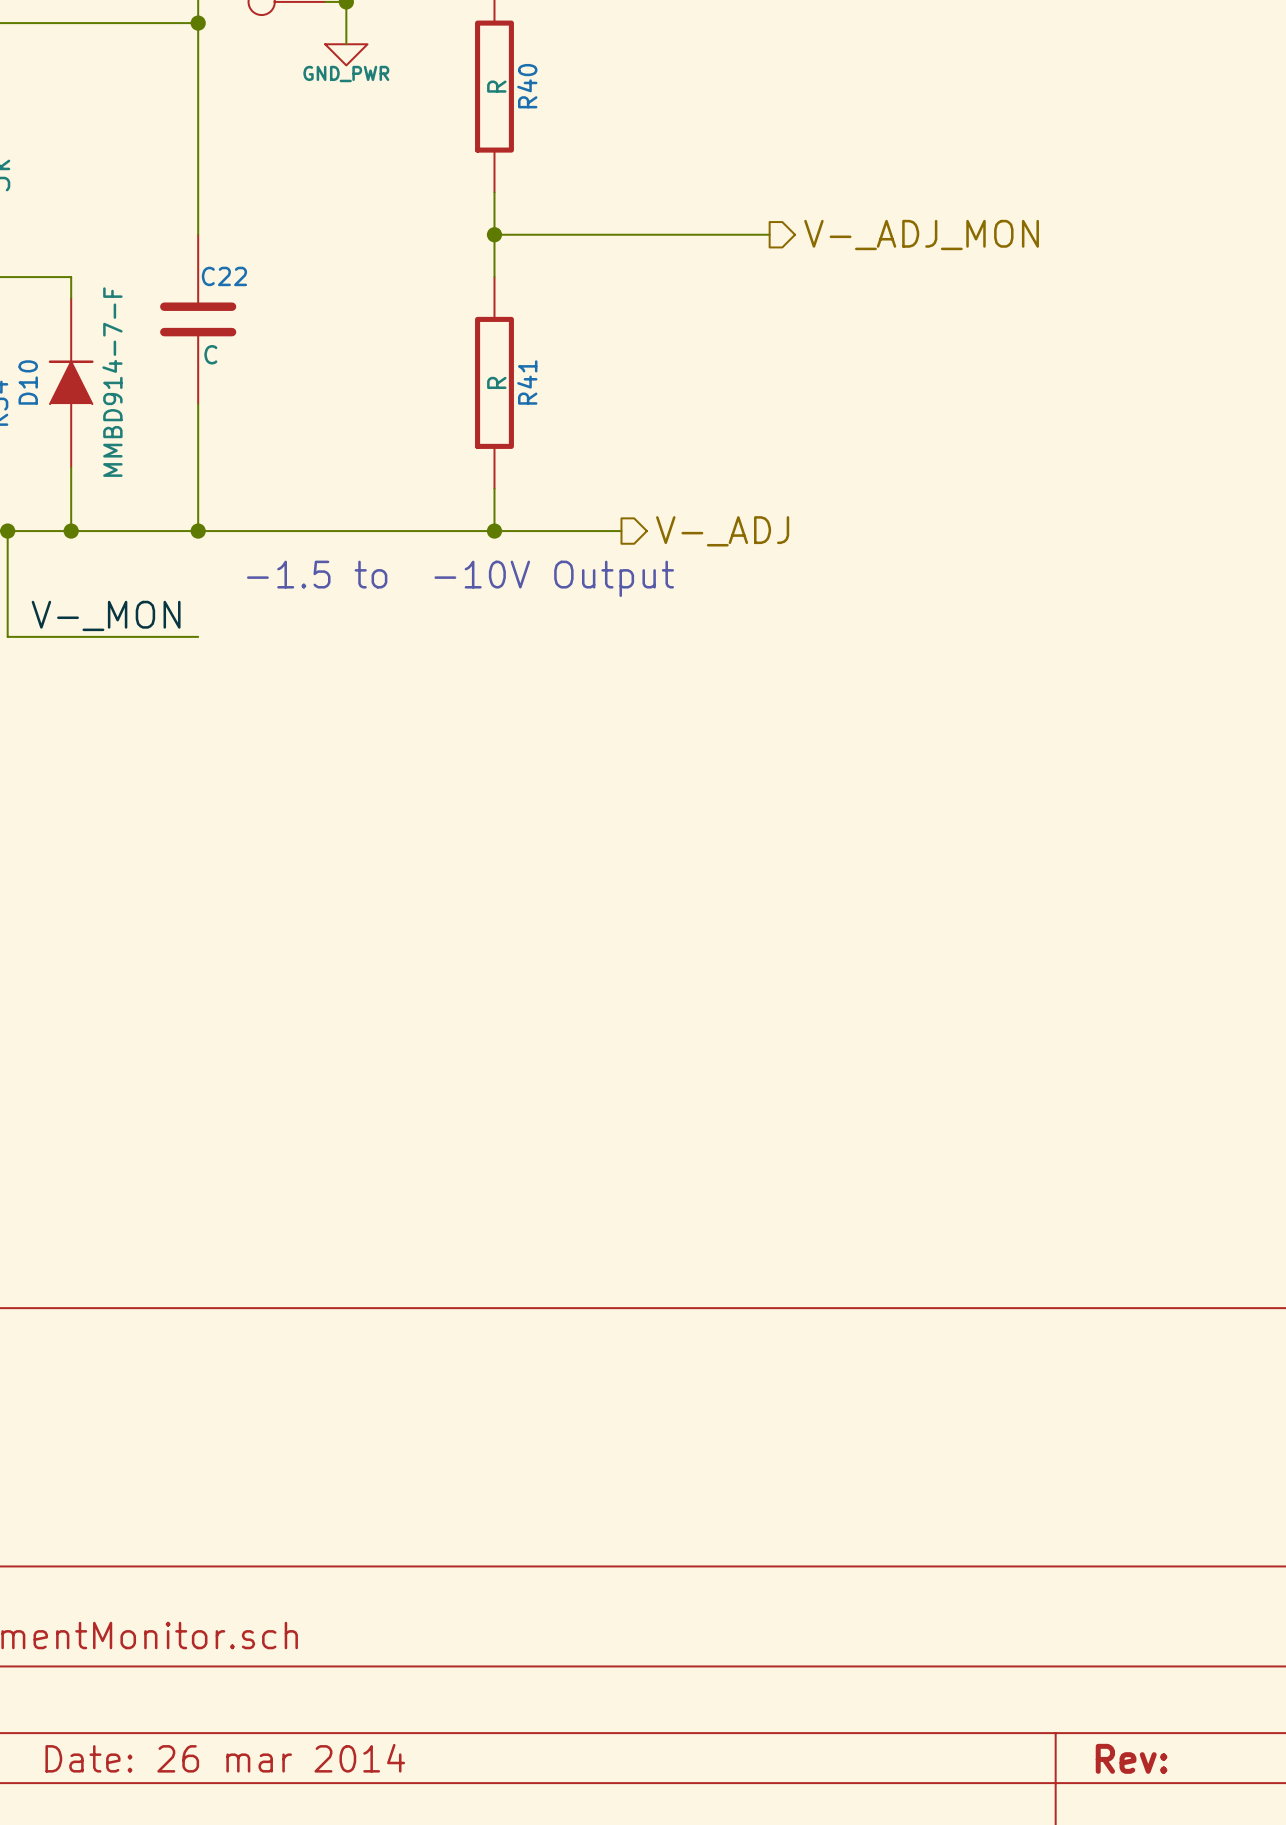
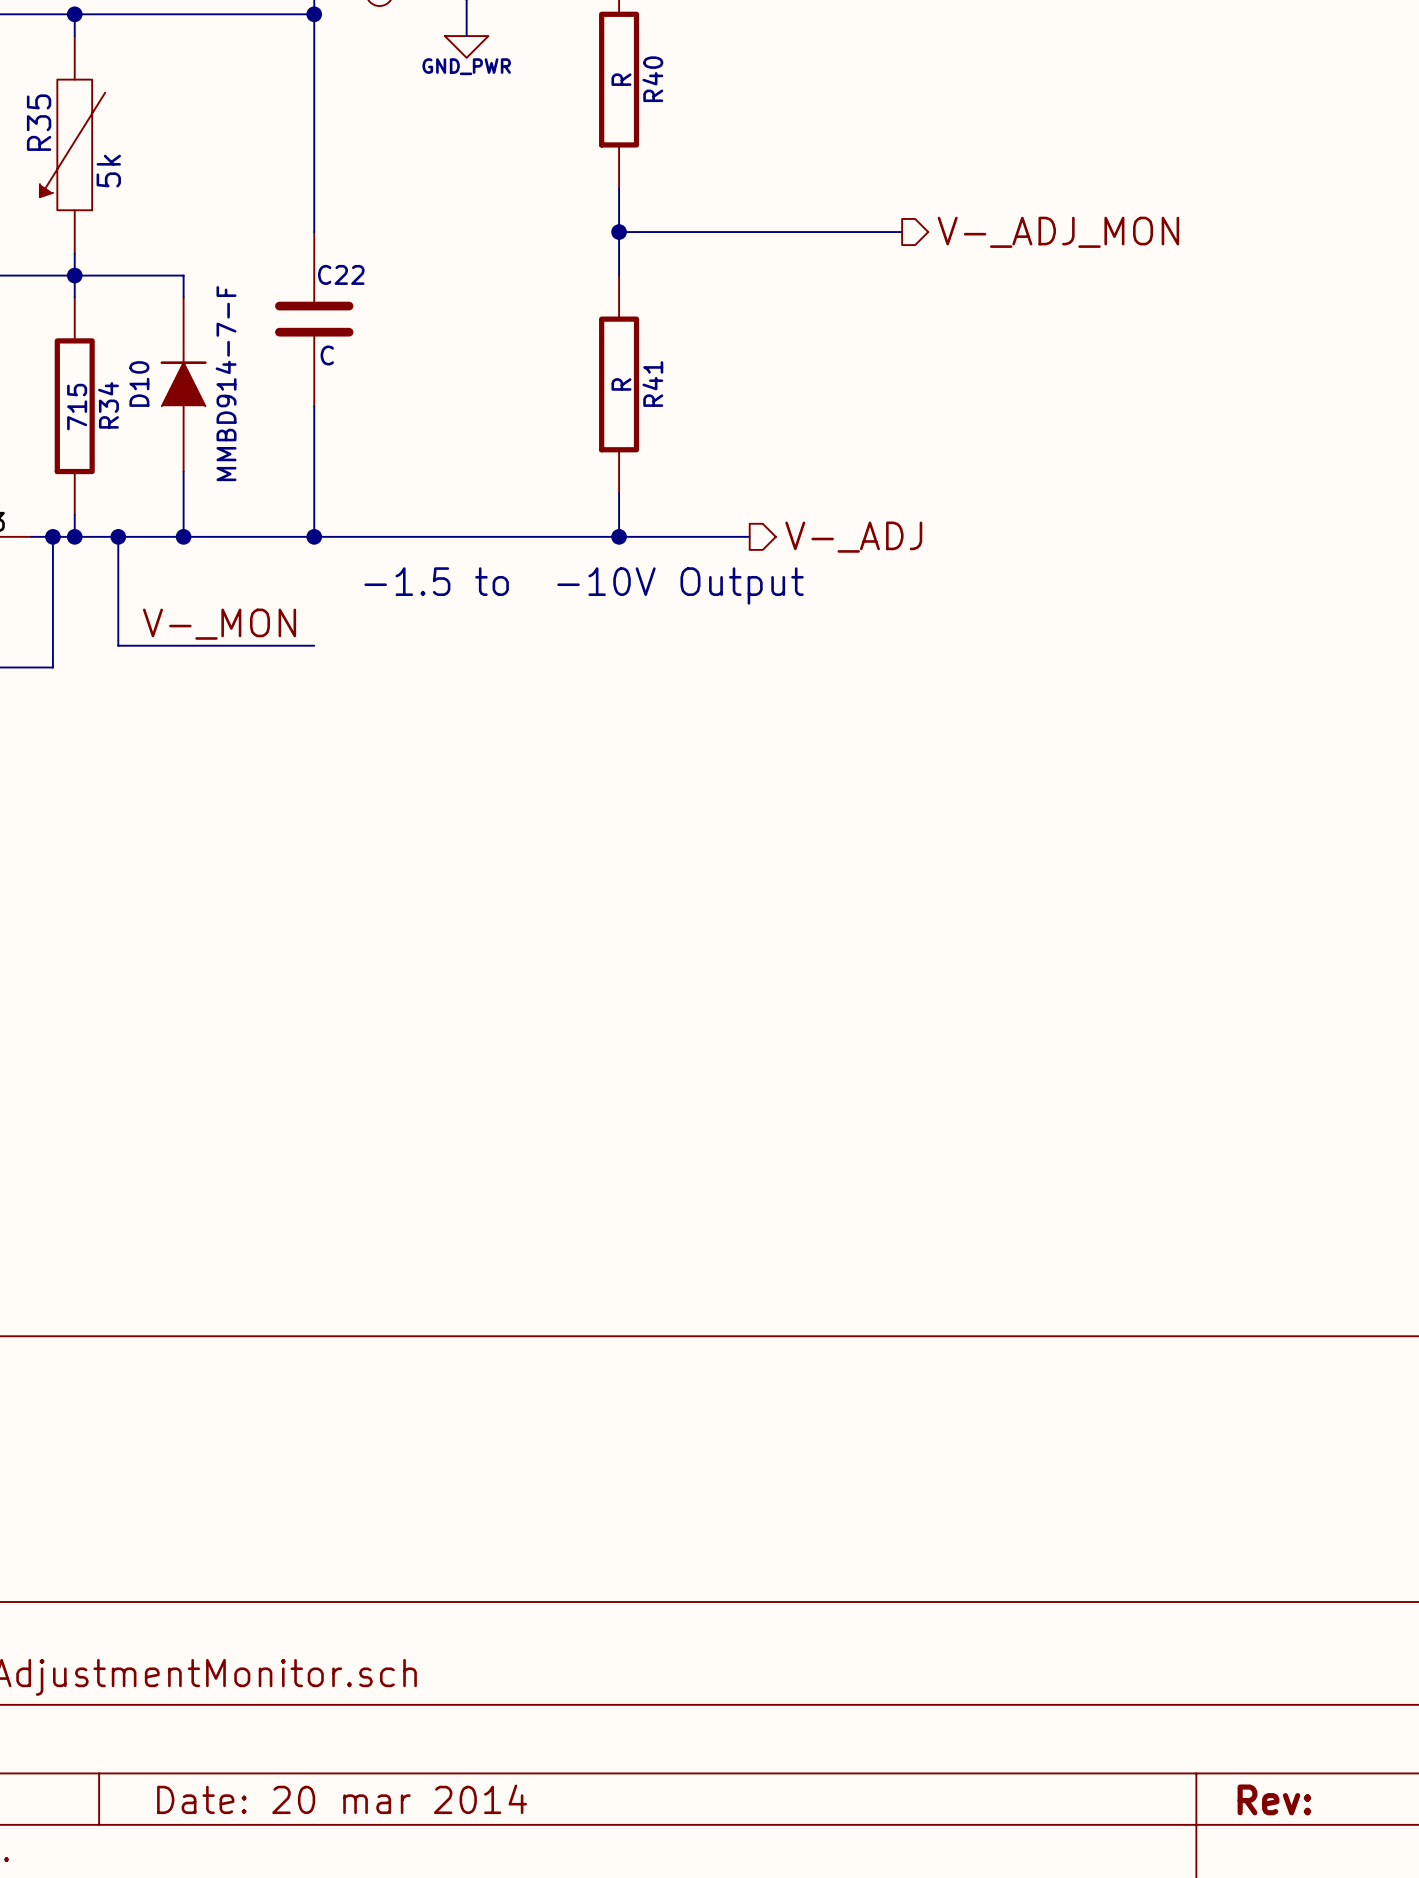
title block: Date: 26 mar 2014 (225, 1758) -> Date: 20 mar 2014 (342, 1799)

